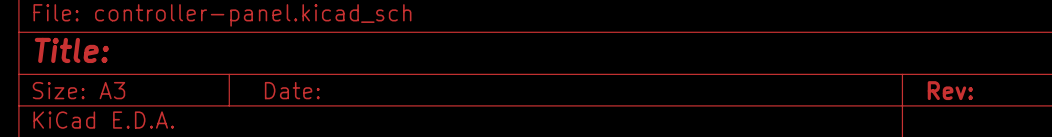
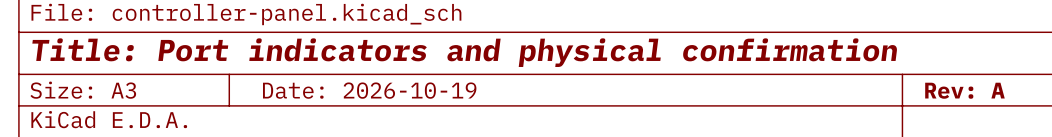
title block: Title: (71, 50) -> Title: Port indicators and physical confirmation (464, 52)
title block: Date: (292, 90) -> Date: 2026-10-19 (369, 90)
title block: Rev: (950, 90) -> Rev: A (964, 90)

